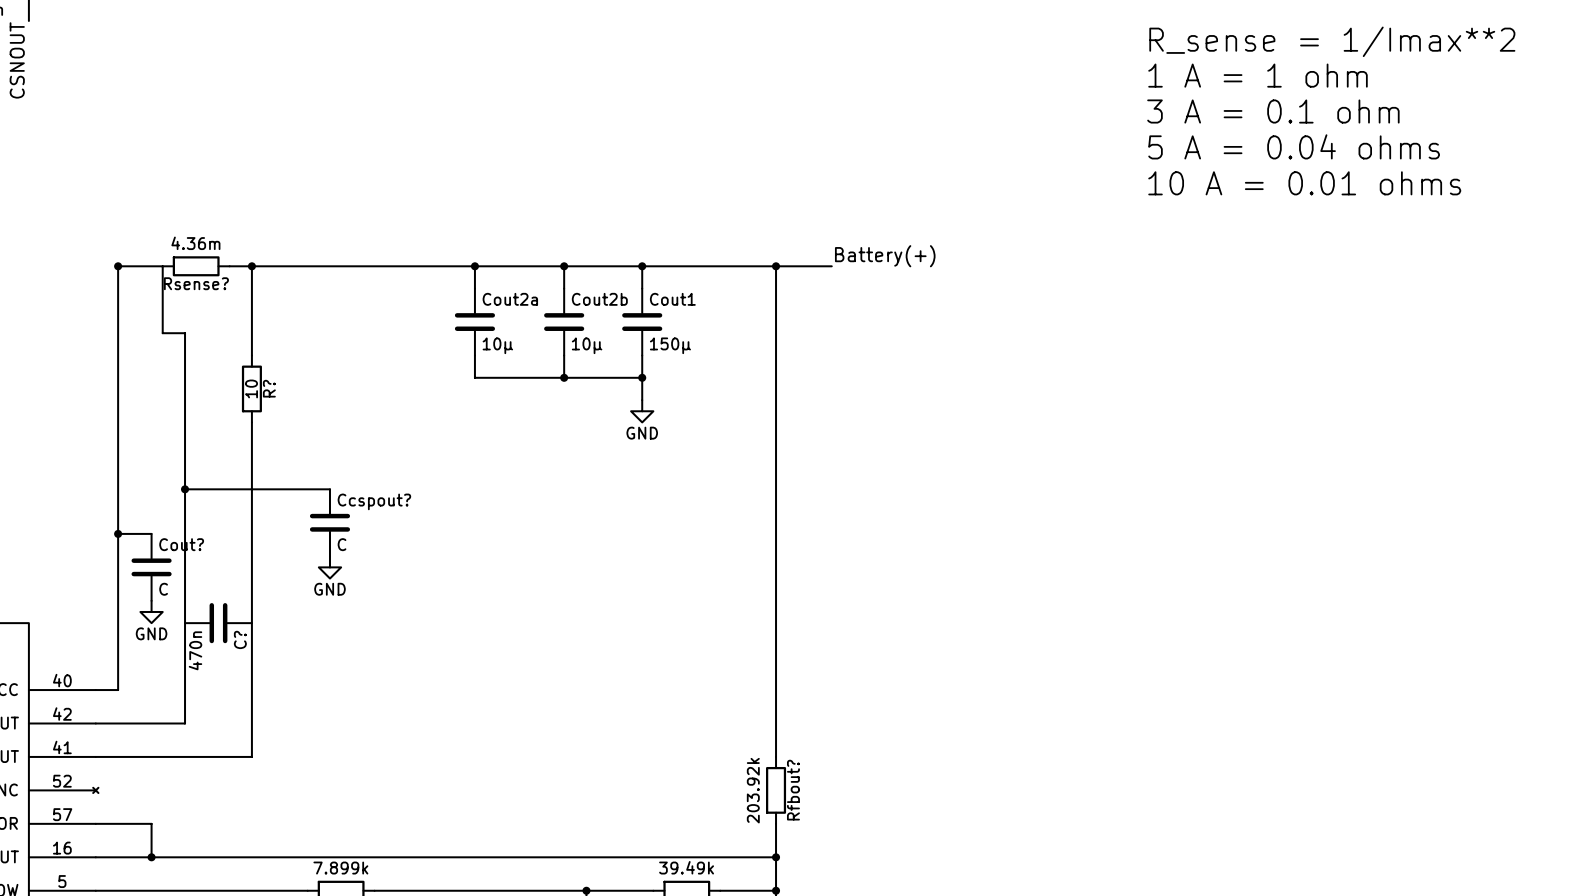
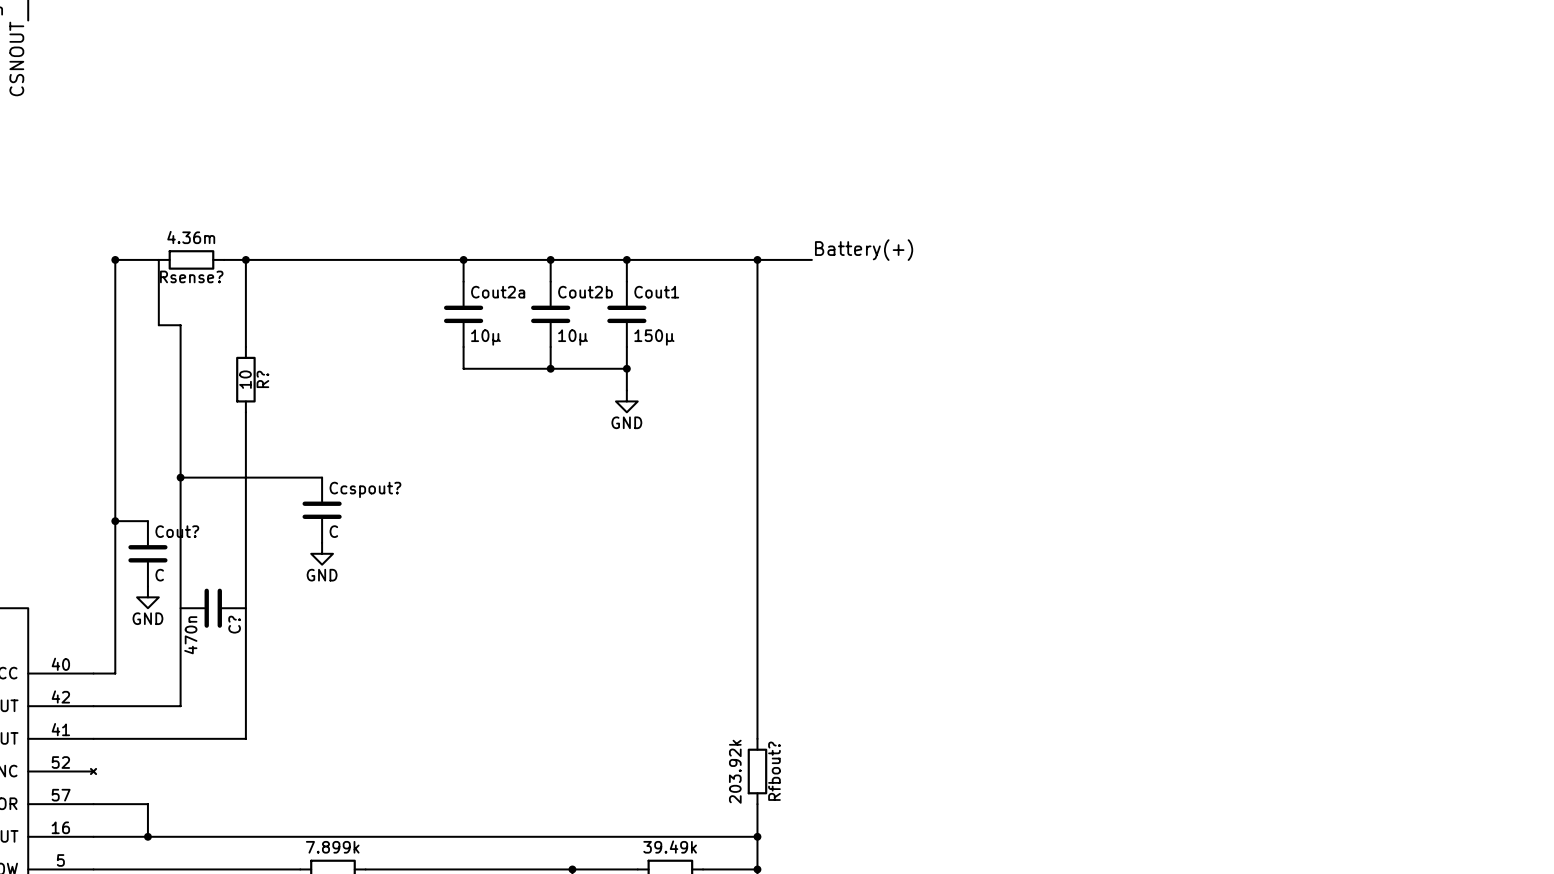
text: R_sense = 1/Imax**2 (1332, 41) -> none
text: 1 A = 1 ohm (1258, 75) -> none
text: 3 A = 0.1 ohm (1273, 111) -> none
text: 5 A = 0.04 ohms (1294, 146) -> none
text: 10 A = 0.01 ohms (1304, 183) -> none

